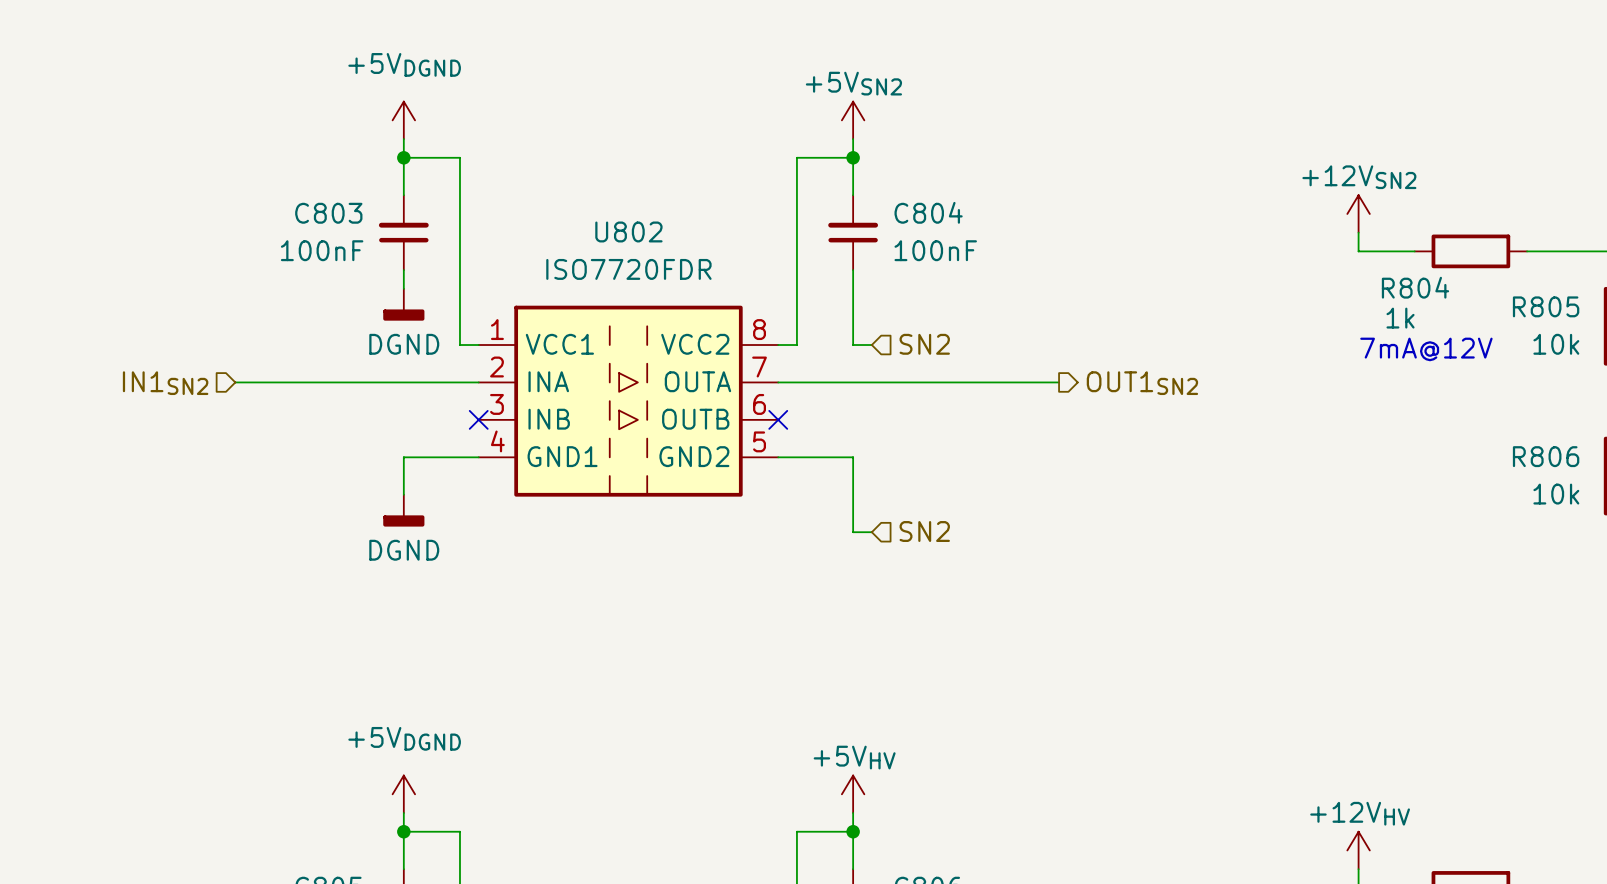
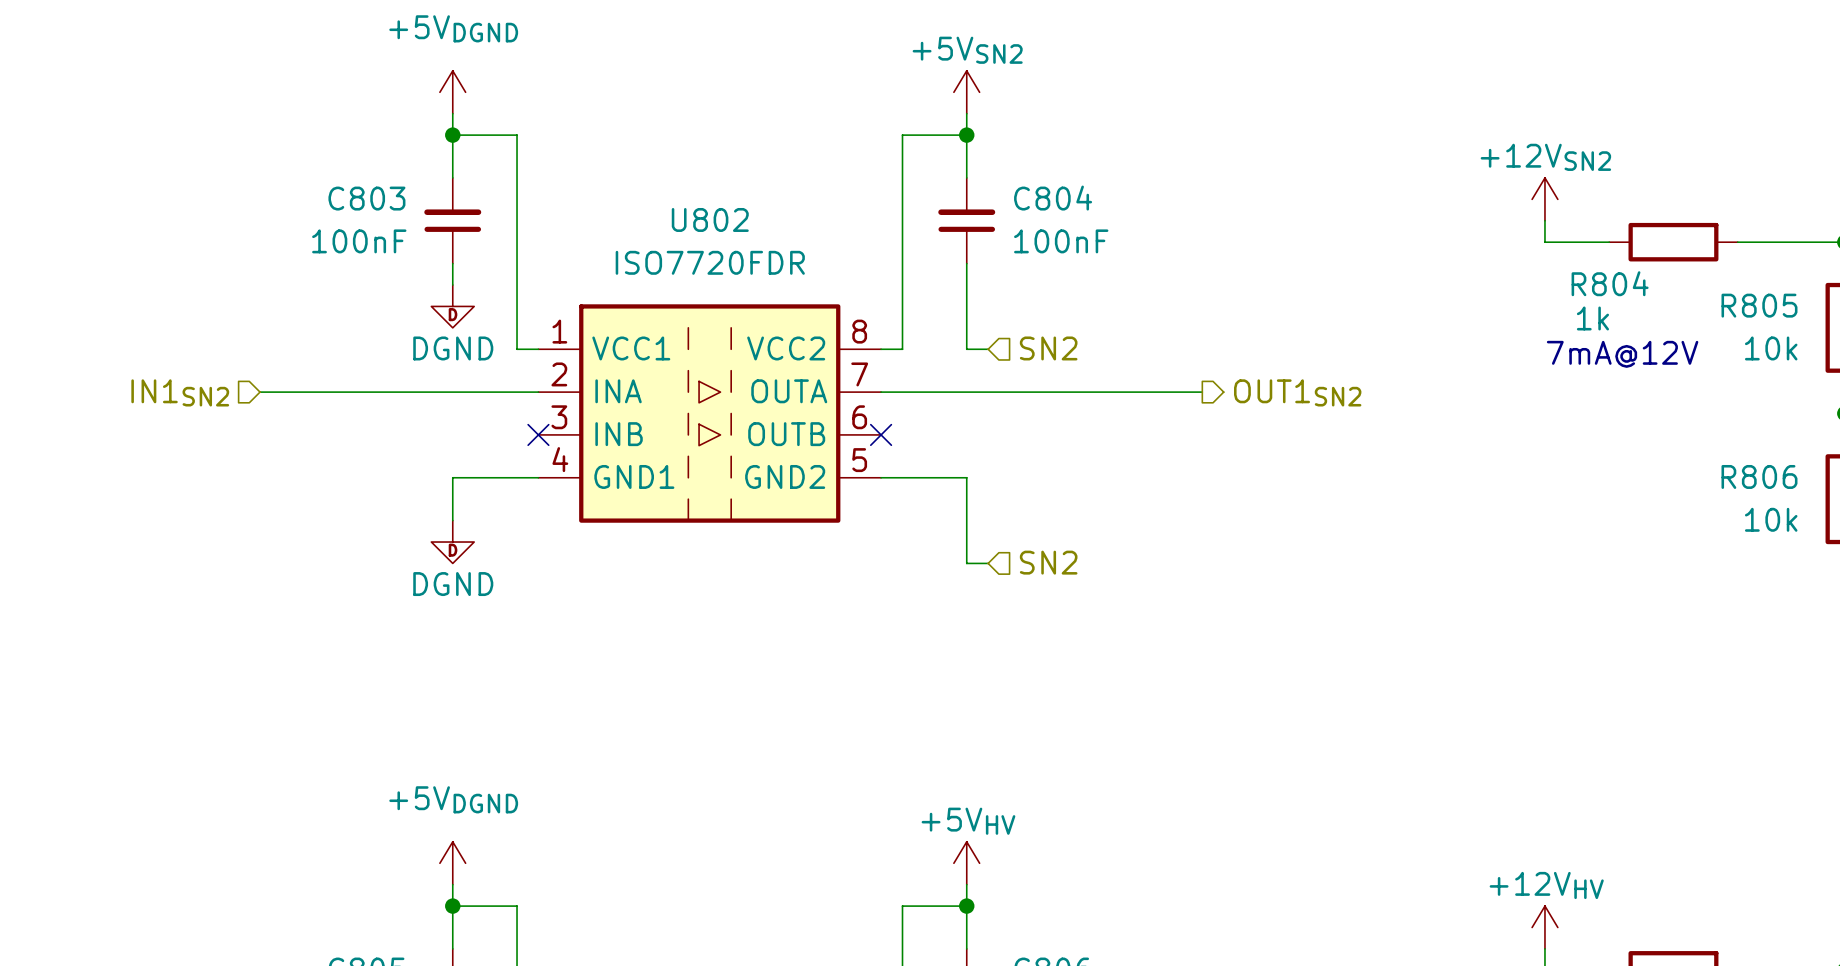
power symbol shape: [383, 288, 425, 321] -> [431, 285, 475, 328]
power symbol shape: [383, 494, 425, 527] -> [431, 520, 475, 564]

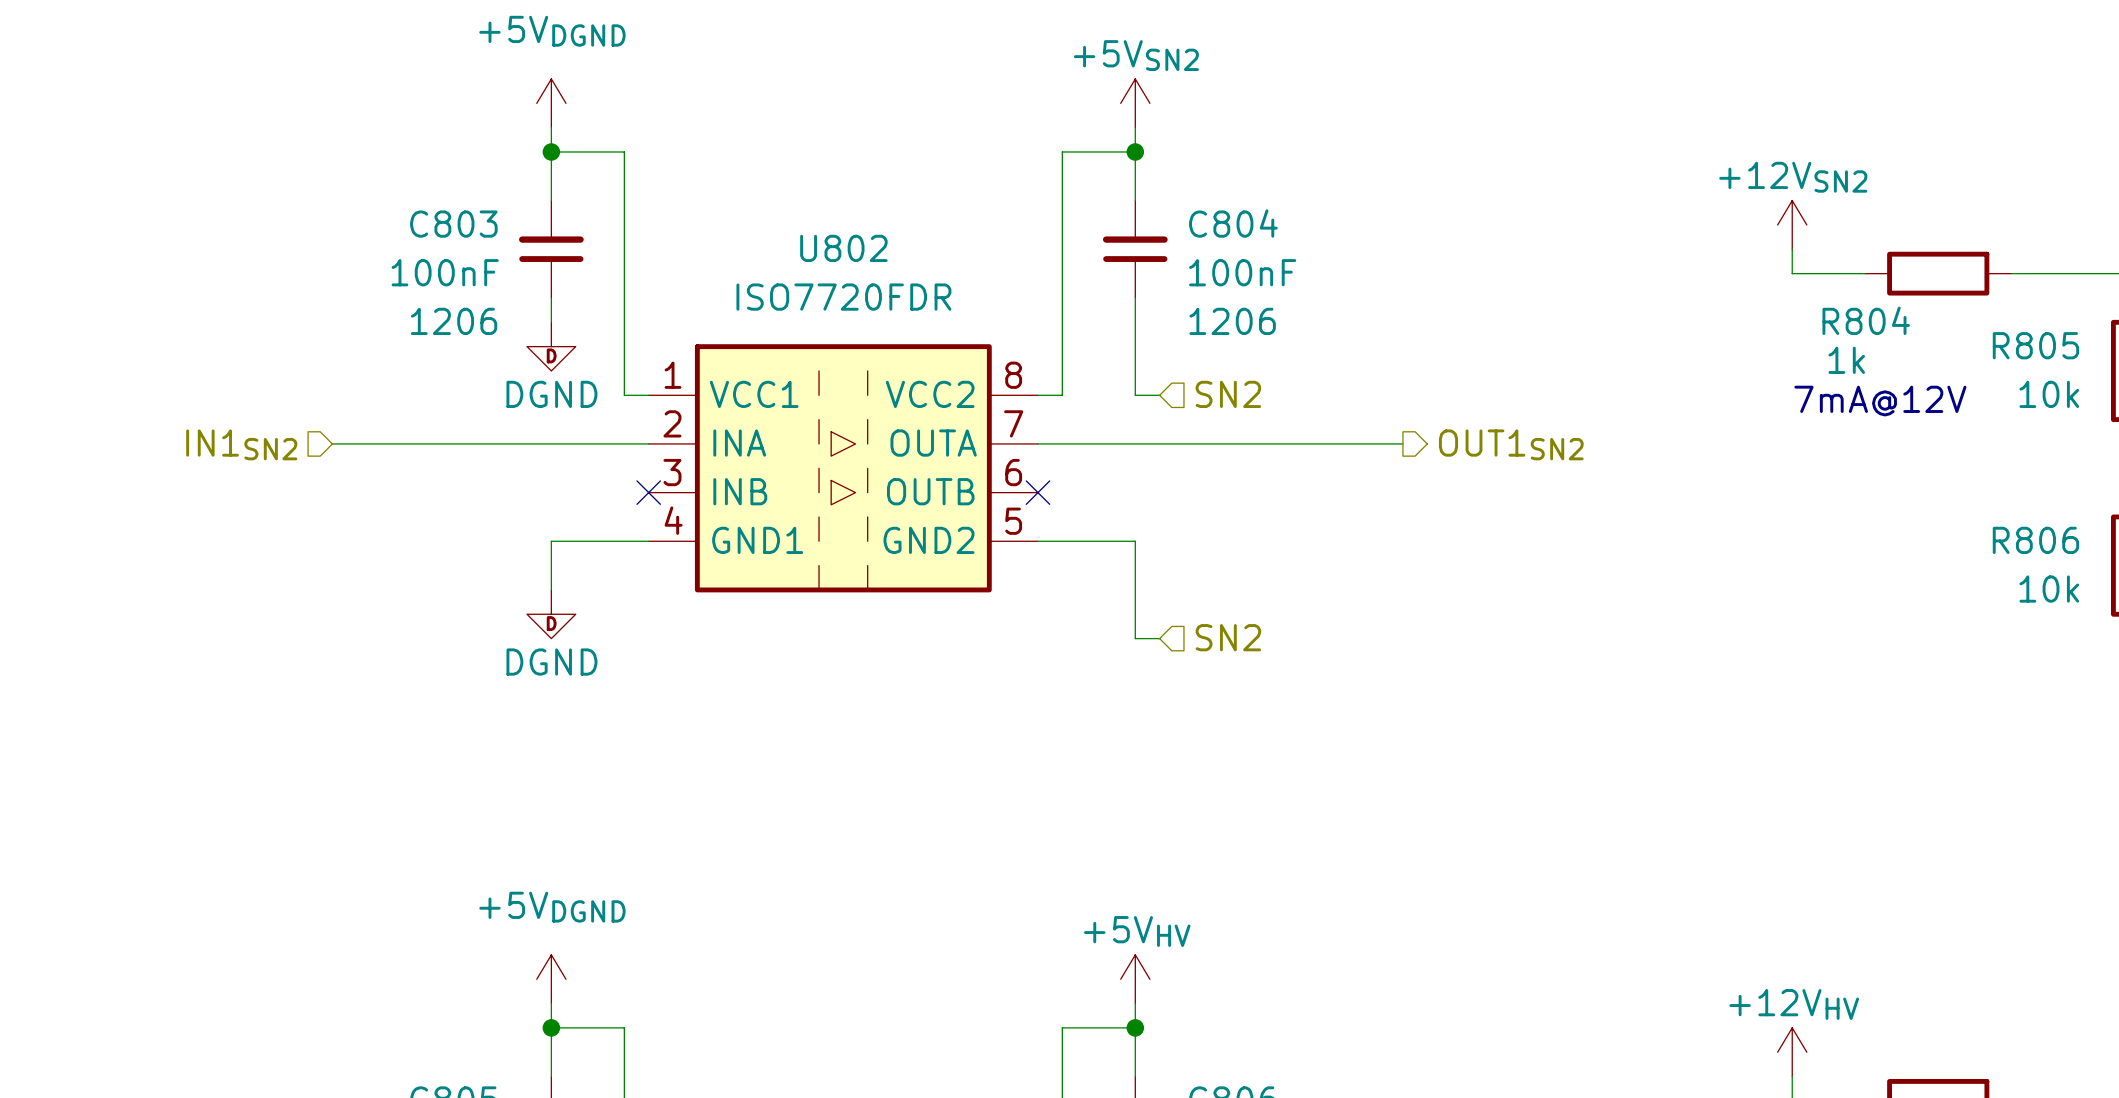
C803 text: none -> 1206 (454, 321)
C804 text: none -> 1206 (1232, 321)

